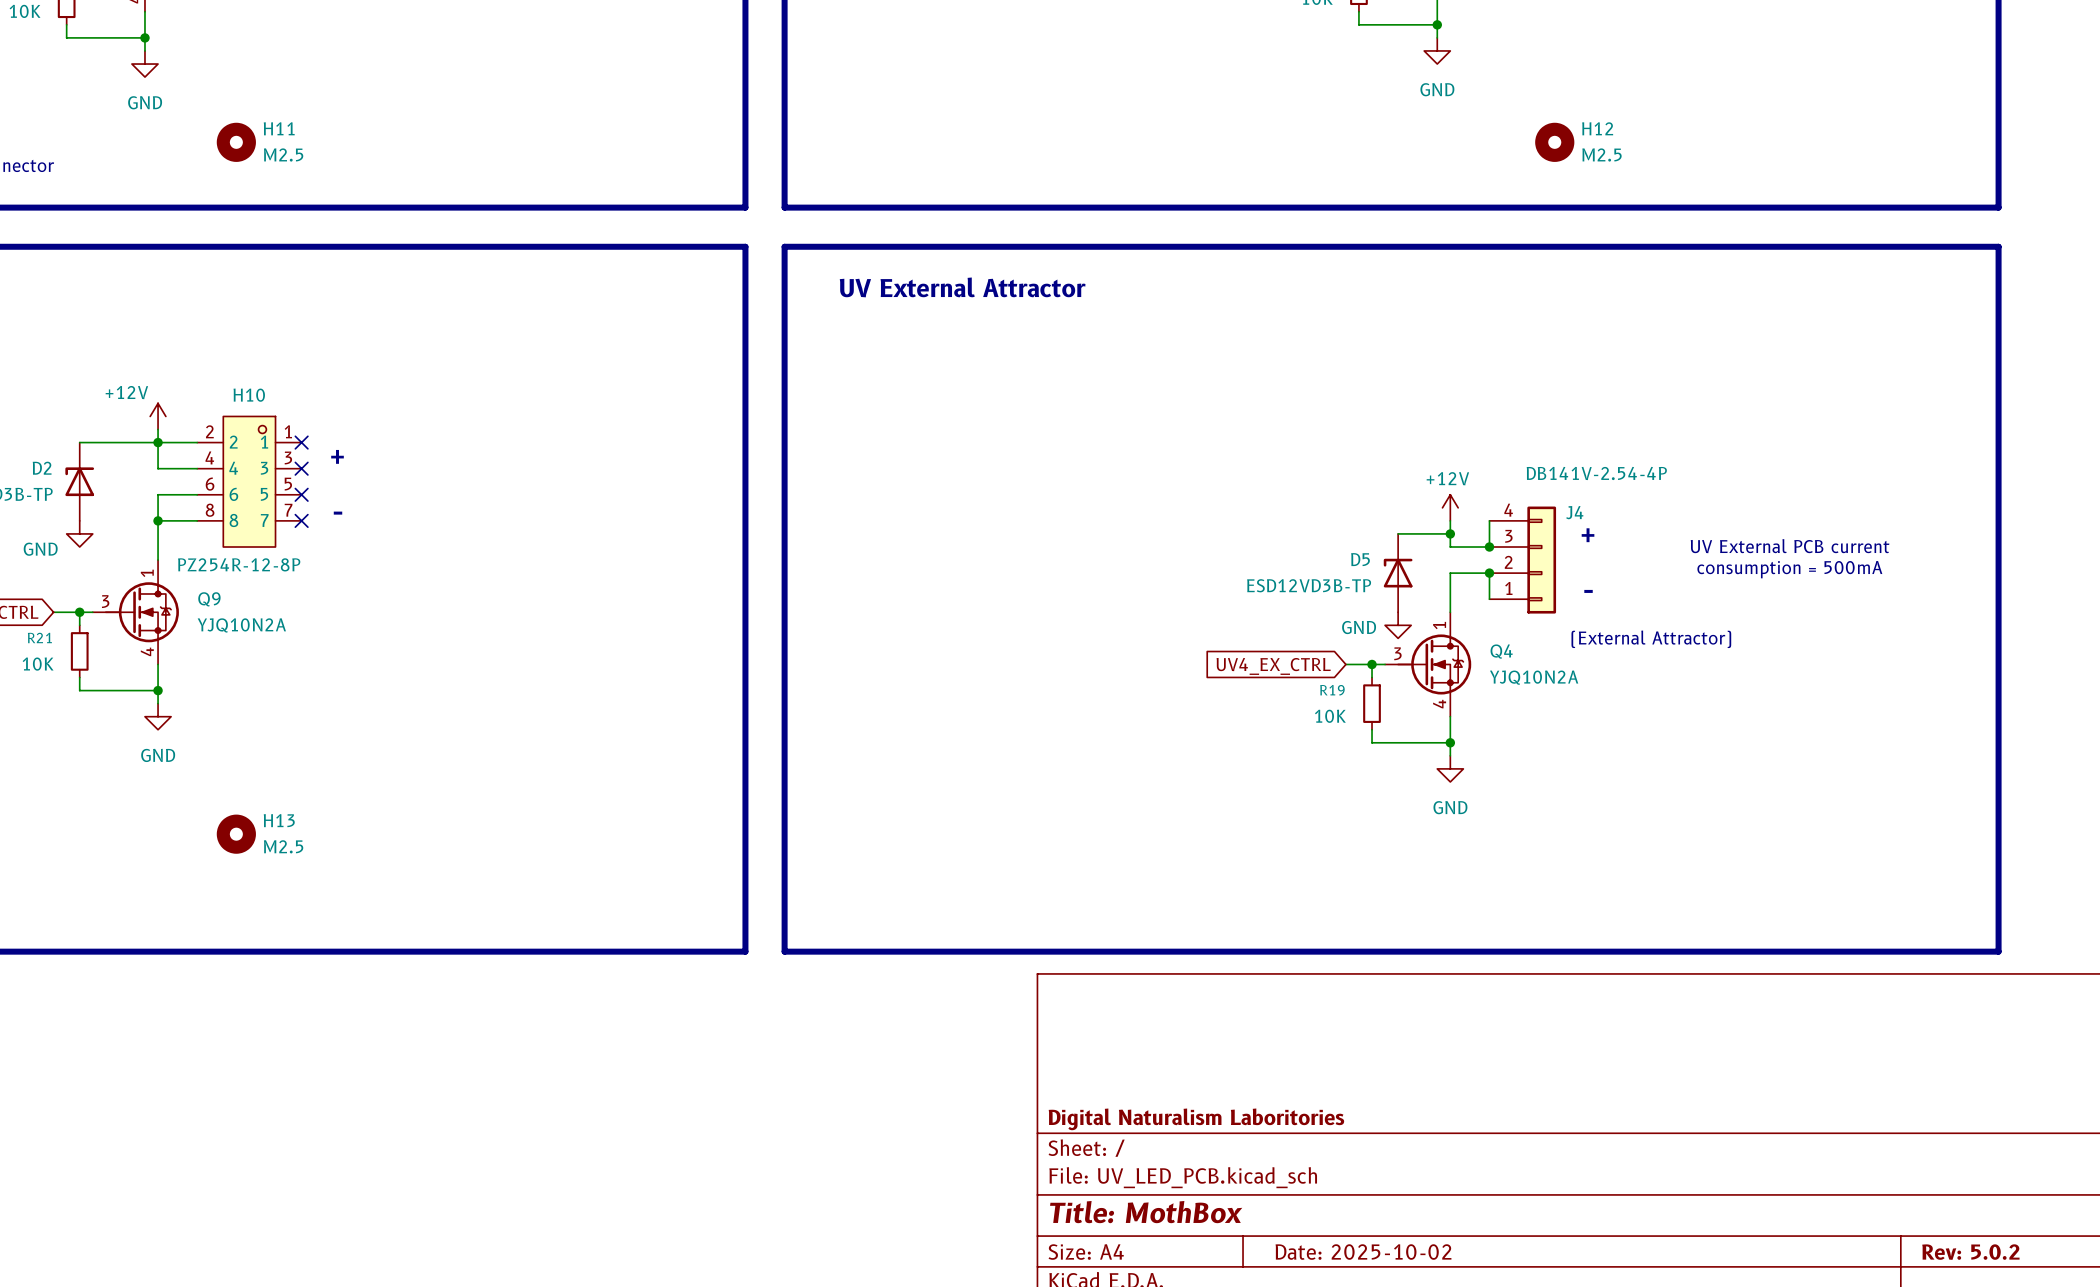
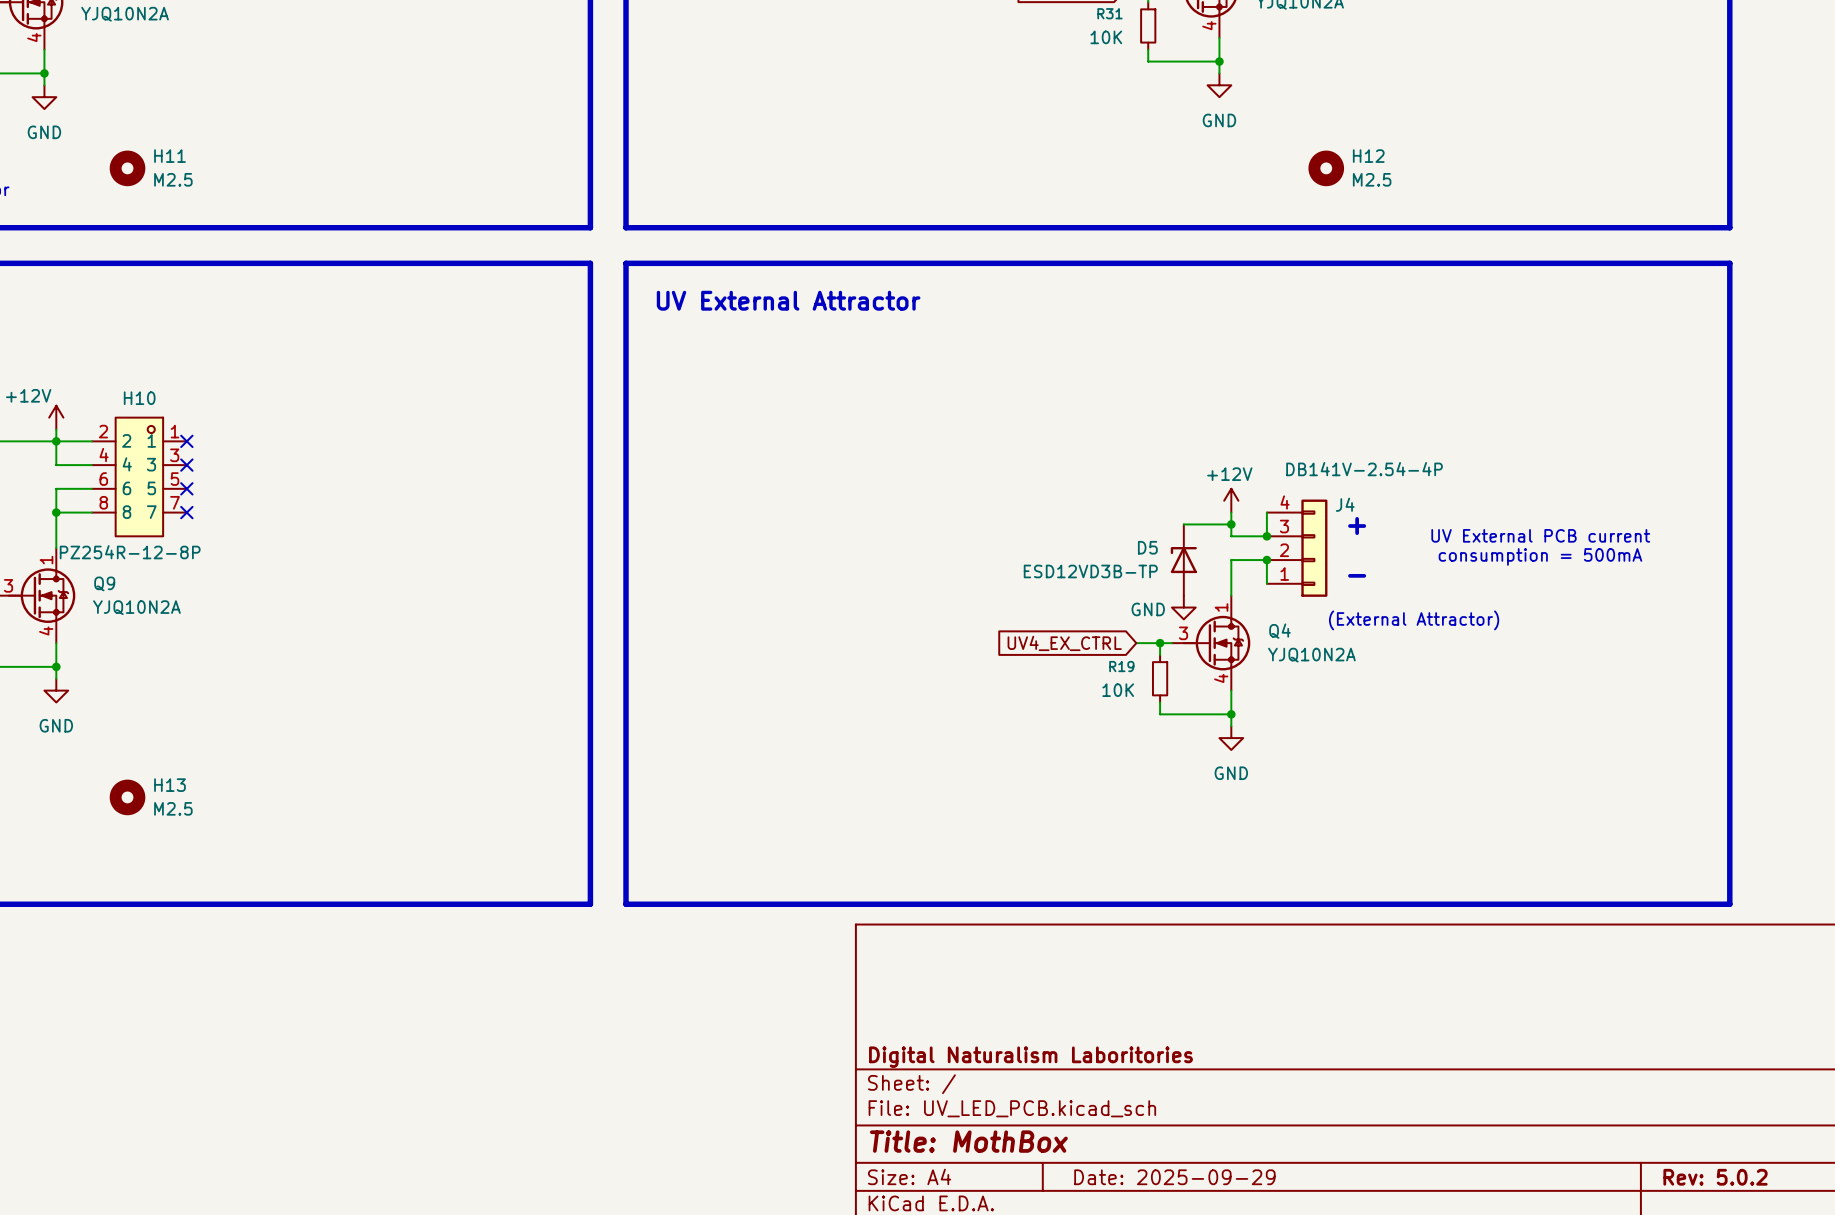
text: + (337, 456) -> none
text: - (338, 513) -> none
title block: Date: 2025-10-02 (1363, 1252) -> Date: 2025-09-29 (1174, 1177)

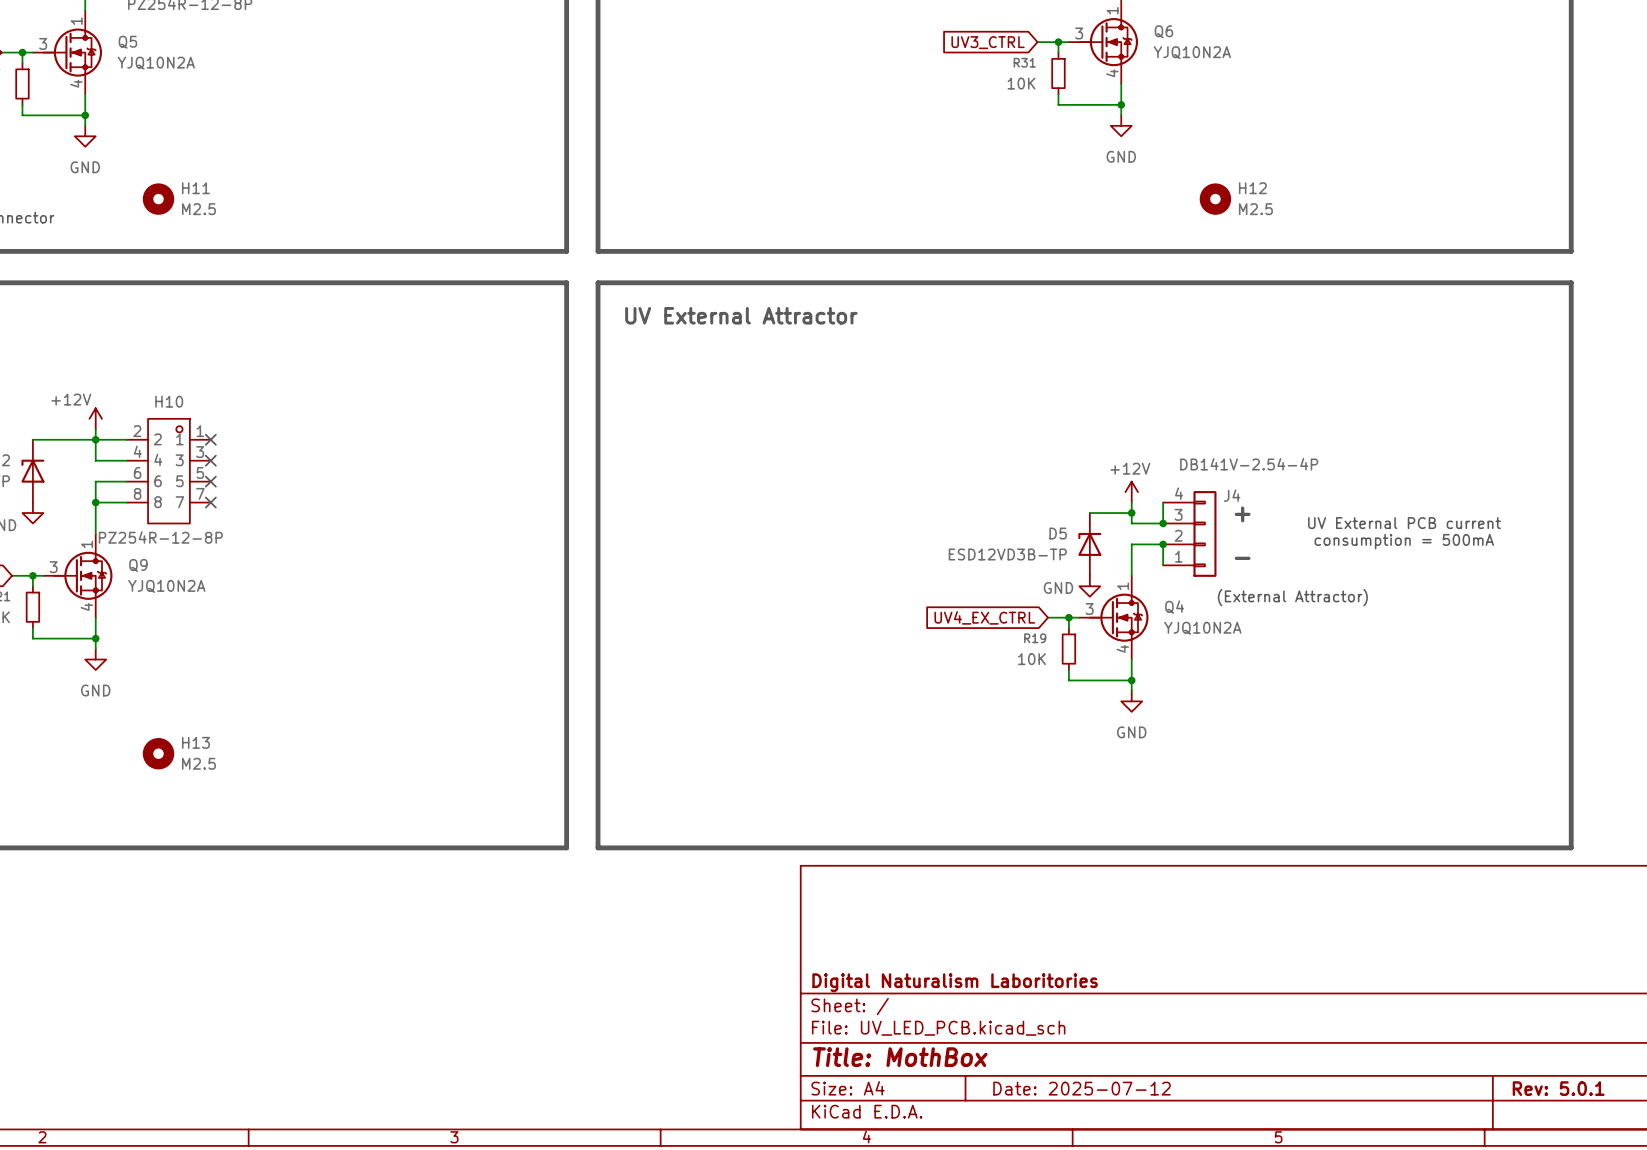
title block: Date: 2025-09-29 (1174, 1177) -> Date: 2025-07-12 (1082, 1088)
title block: Rev: 5.0.2 (1715, 1177) -> Rev: 5.0.1 (1558, 1088)

